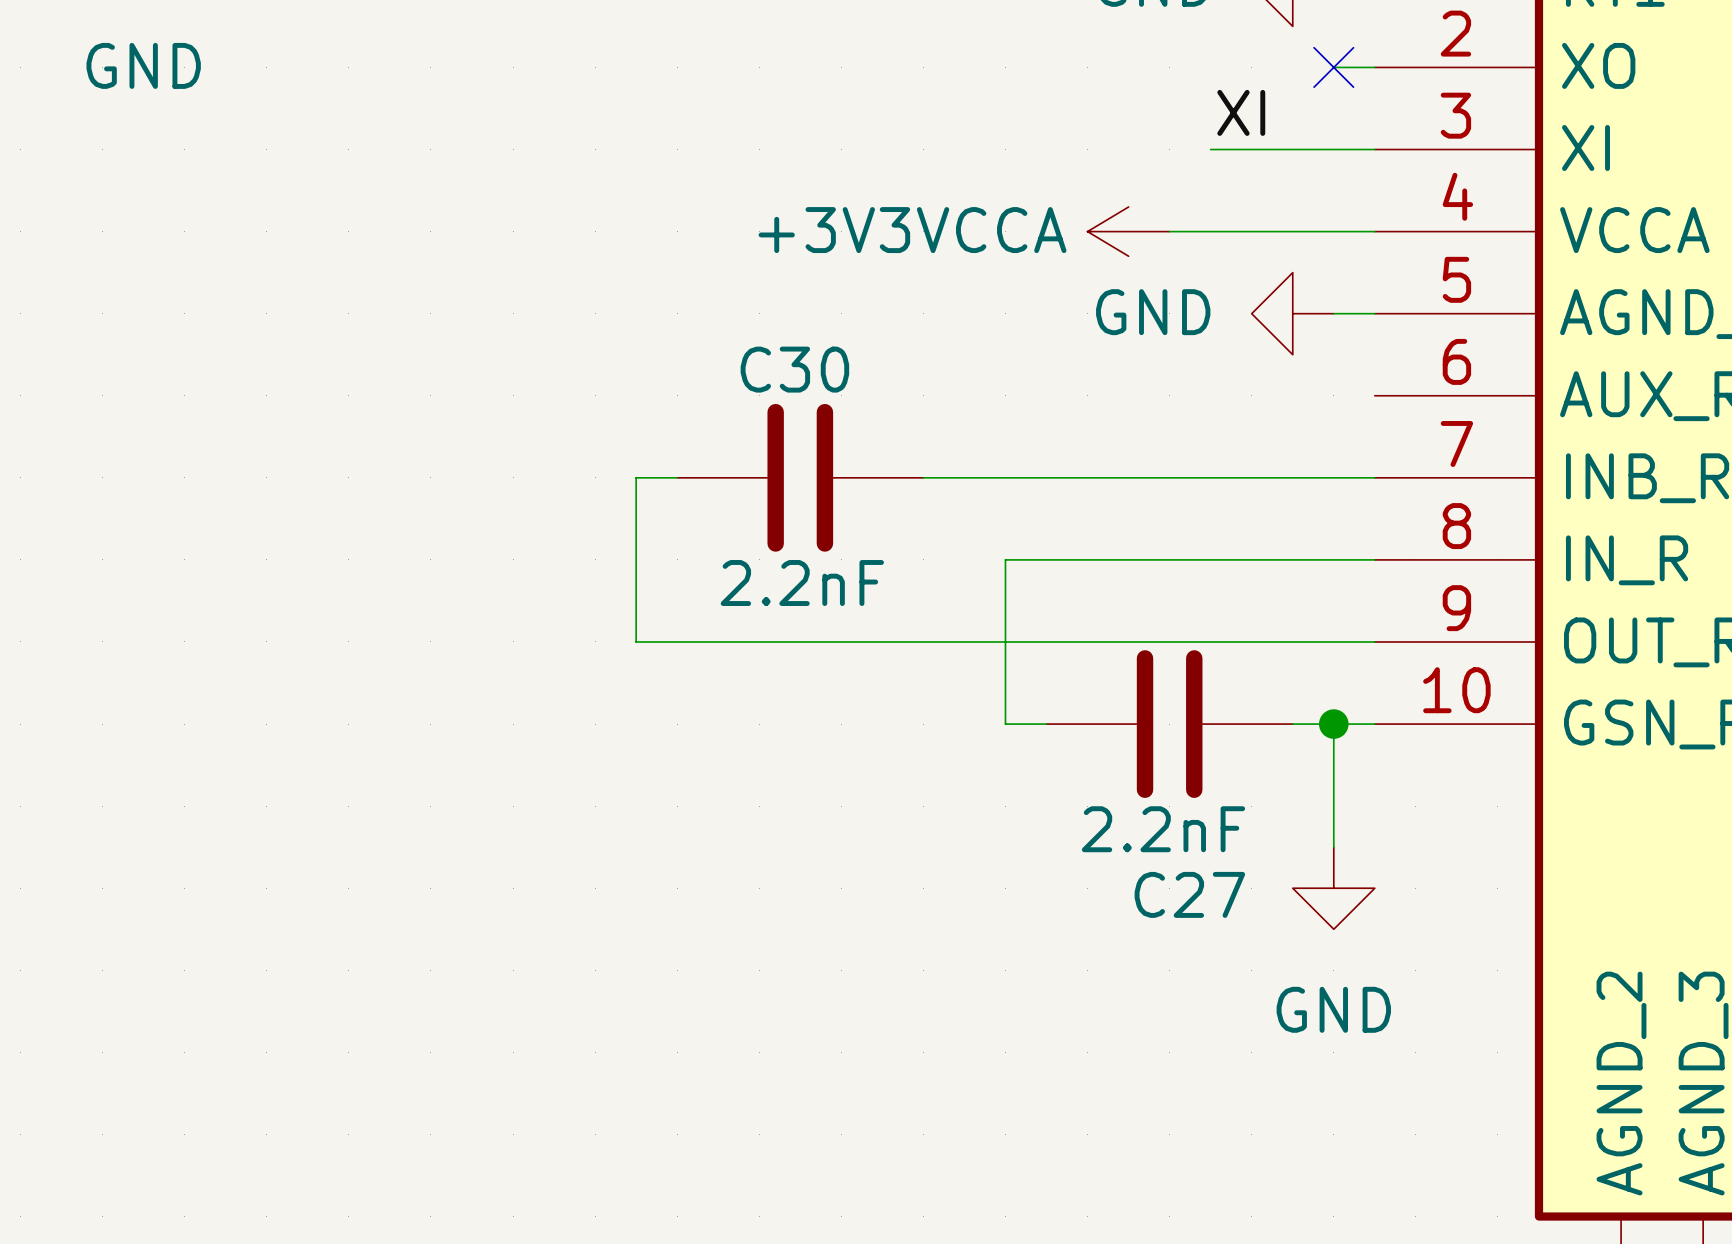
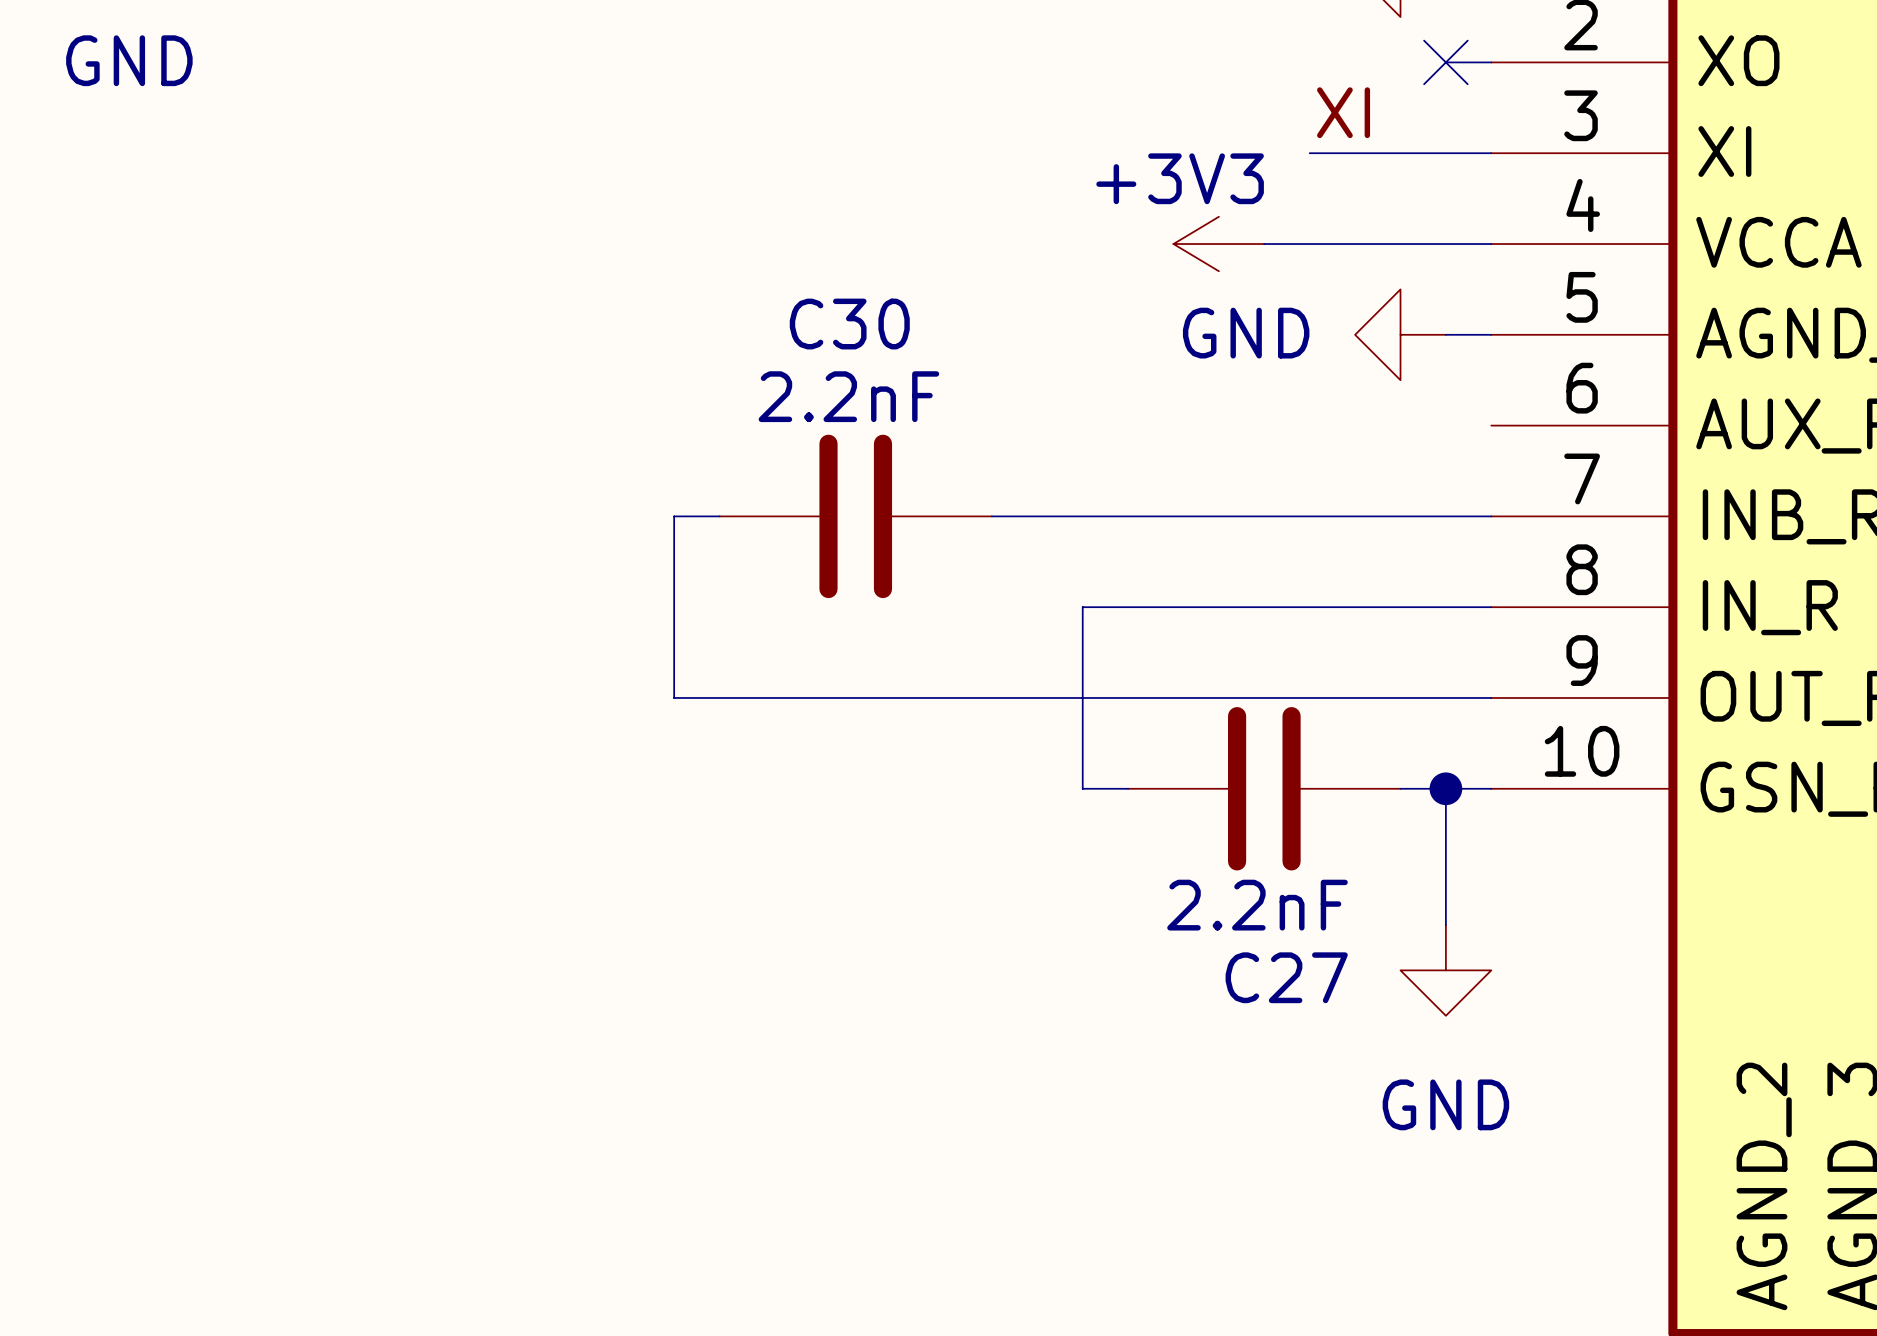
power symbol: +3V3VCCA (1128, 231) -> +3V3 (1218, 244)
C30 name position: C30 (794, 369) -> C30 (849, 324)
C30 value position: 2.2nF (802, 583) -> 2.2nF (848, 396)

